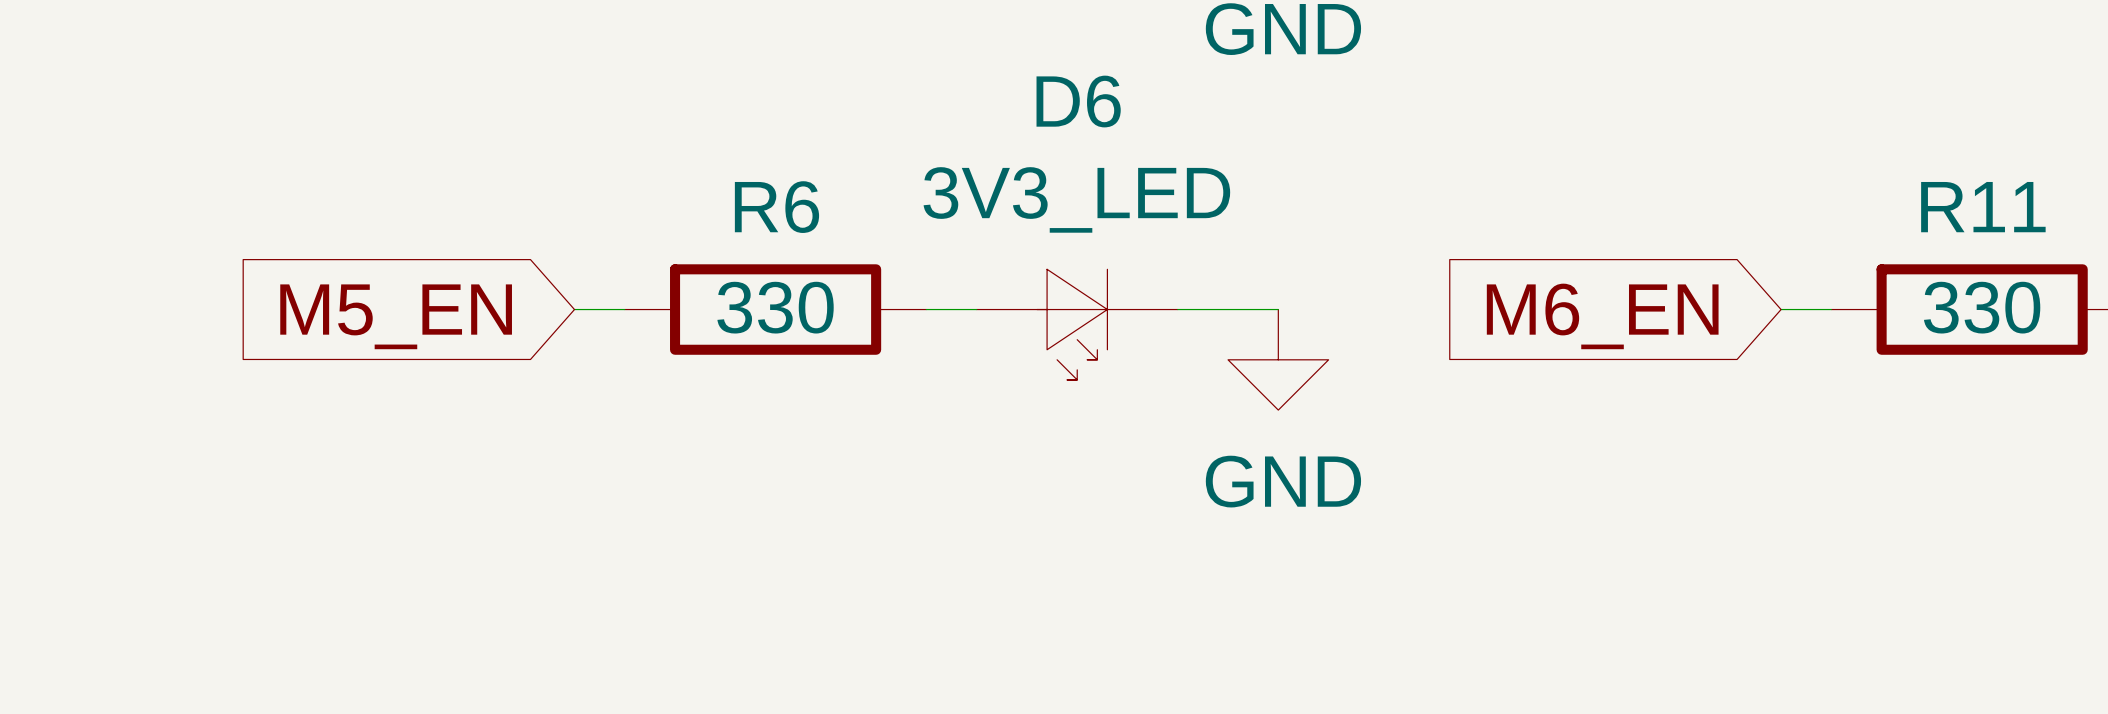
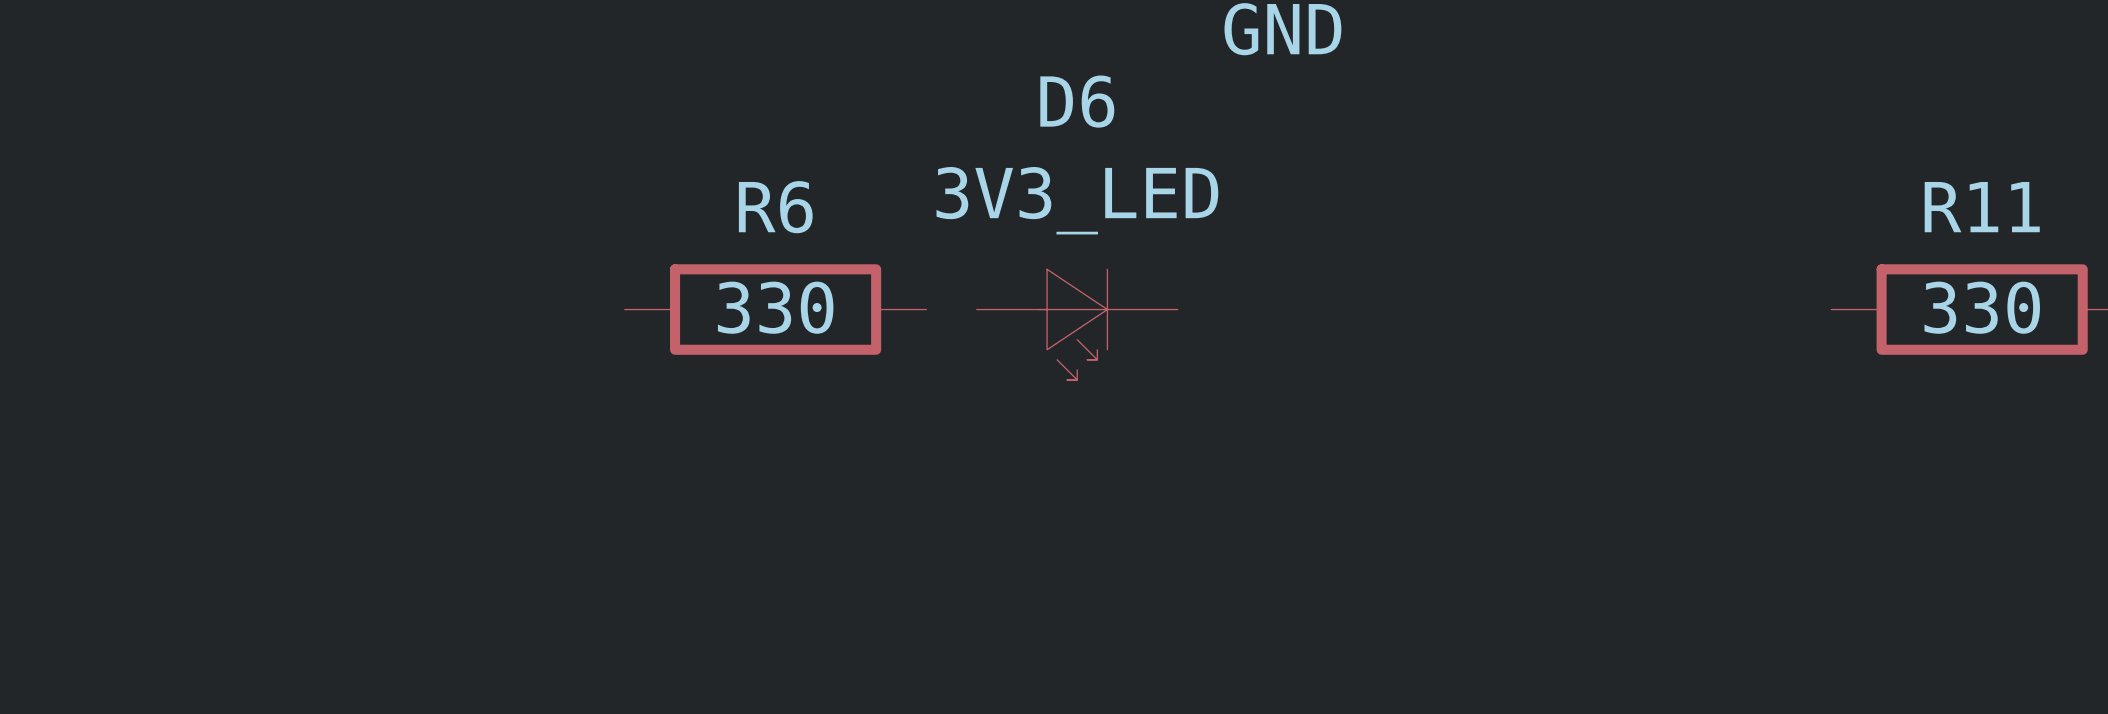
wire: (574, 309) (624, 309) -> none
wire: (926, 309) (976, 309) -> none
wire: (1177, 309) (1278, 309) -> none
wire: (1781, 309) (1831, 309) -> none
global label: M5_EN (396, 316) -> none
global label: M6_EN (1602, 316) -> none
power symbol: GND (1278, 359) -> none

